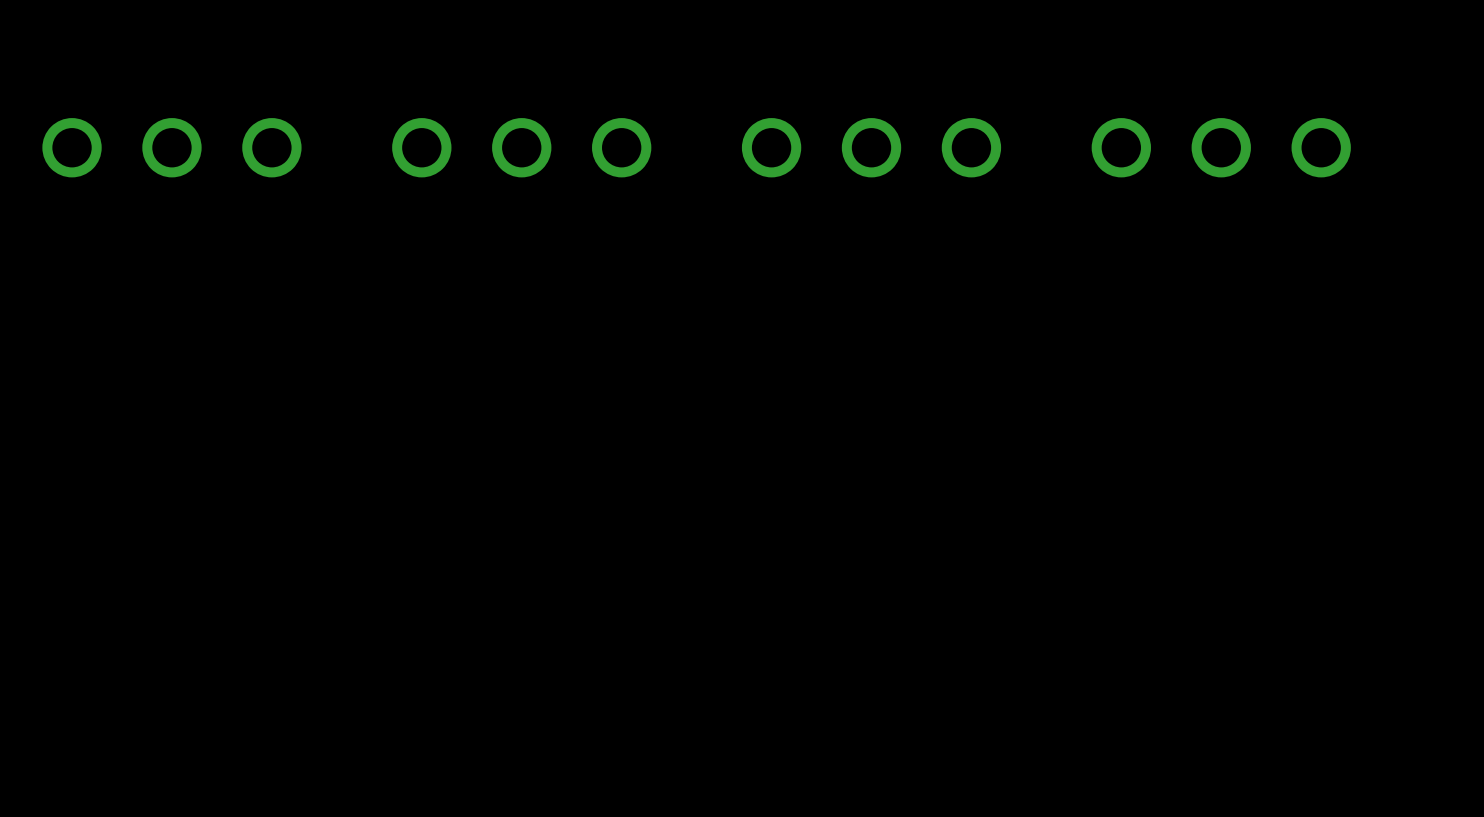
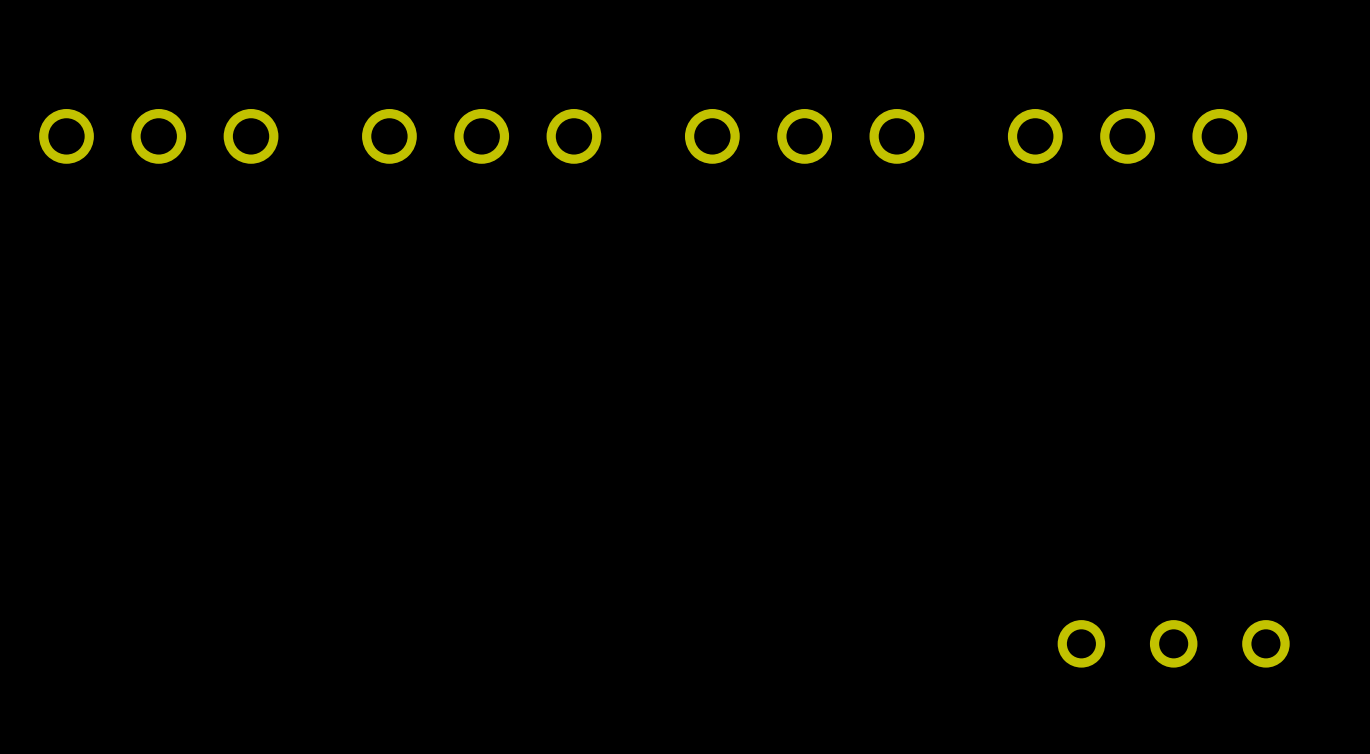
part: none -> (1173, 643)

